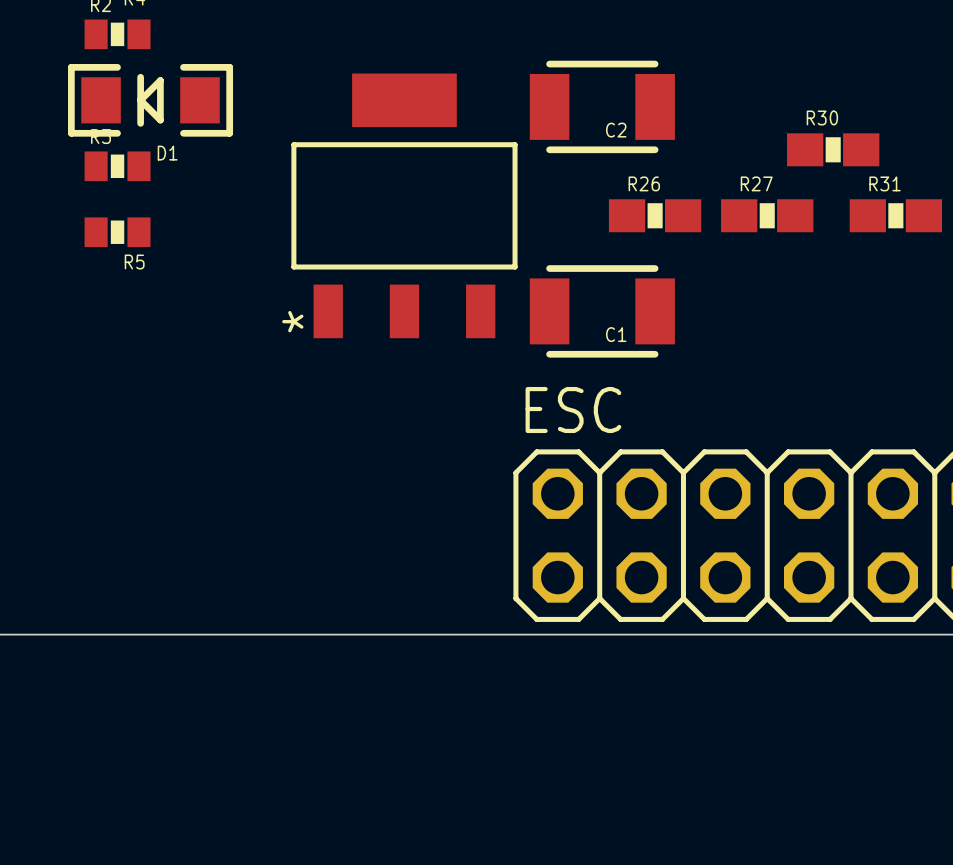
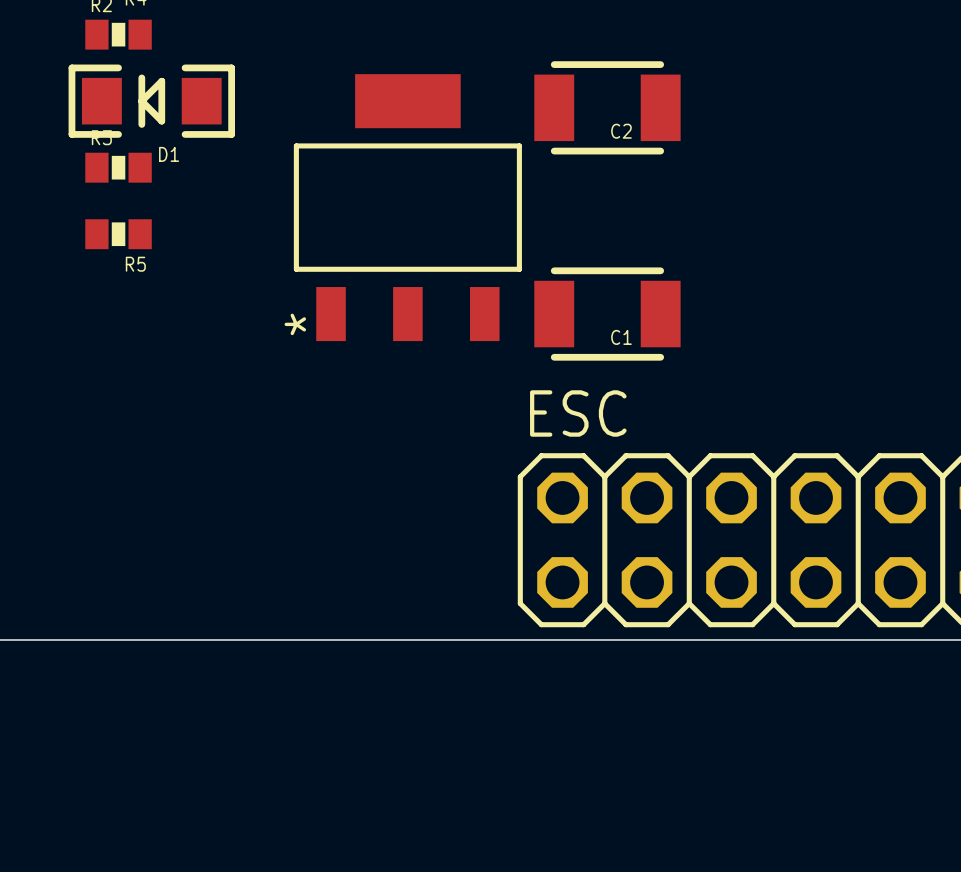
R30: (833, 149) -> none
R26: (655, 215) -> none
R27: (767, 215) -> none
R31: (895, 215) -> none

